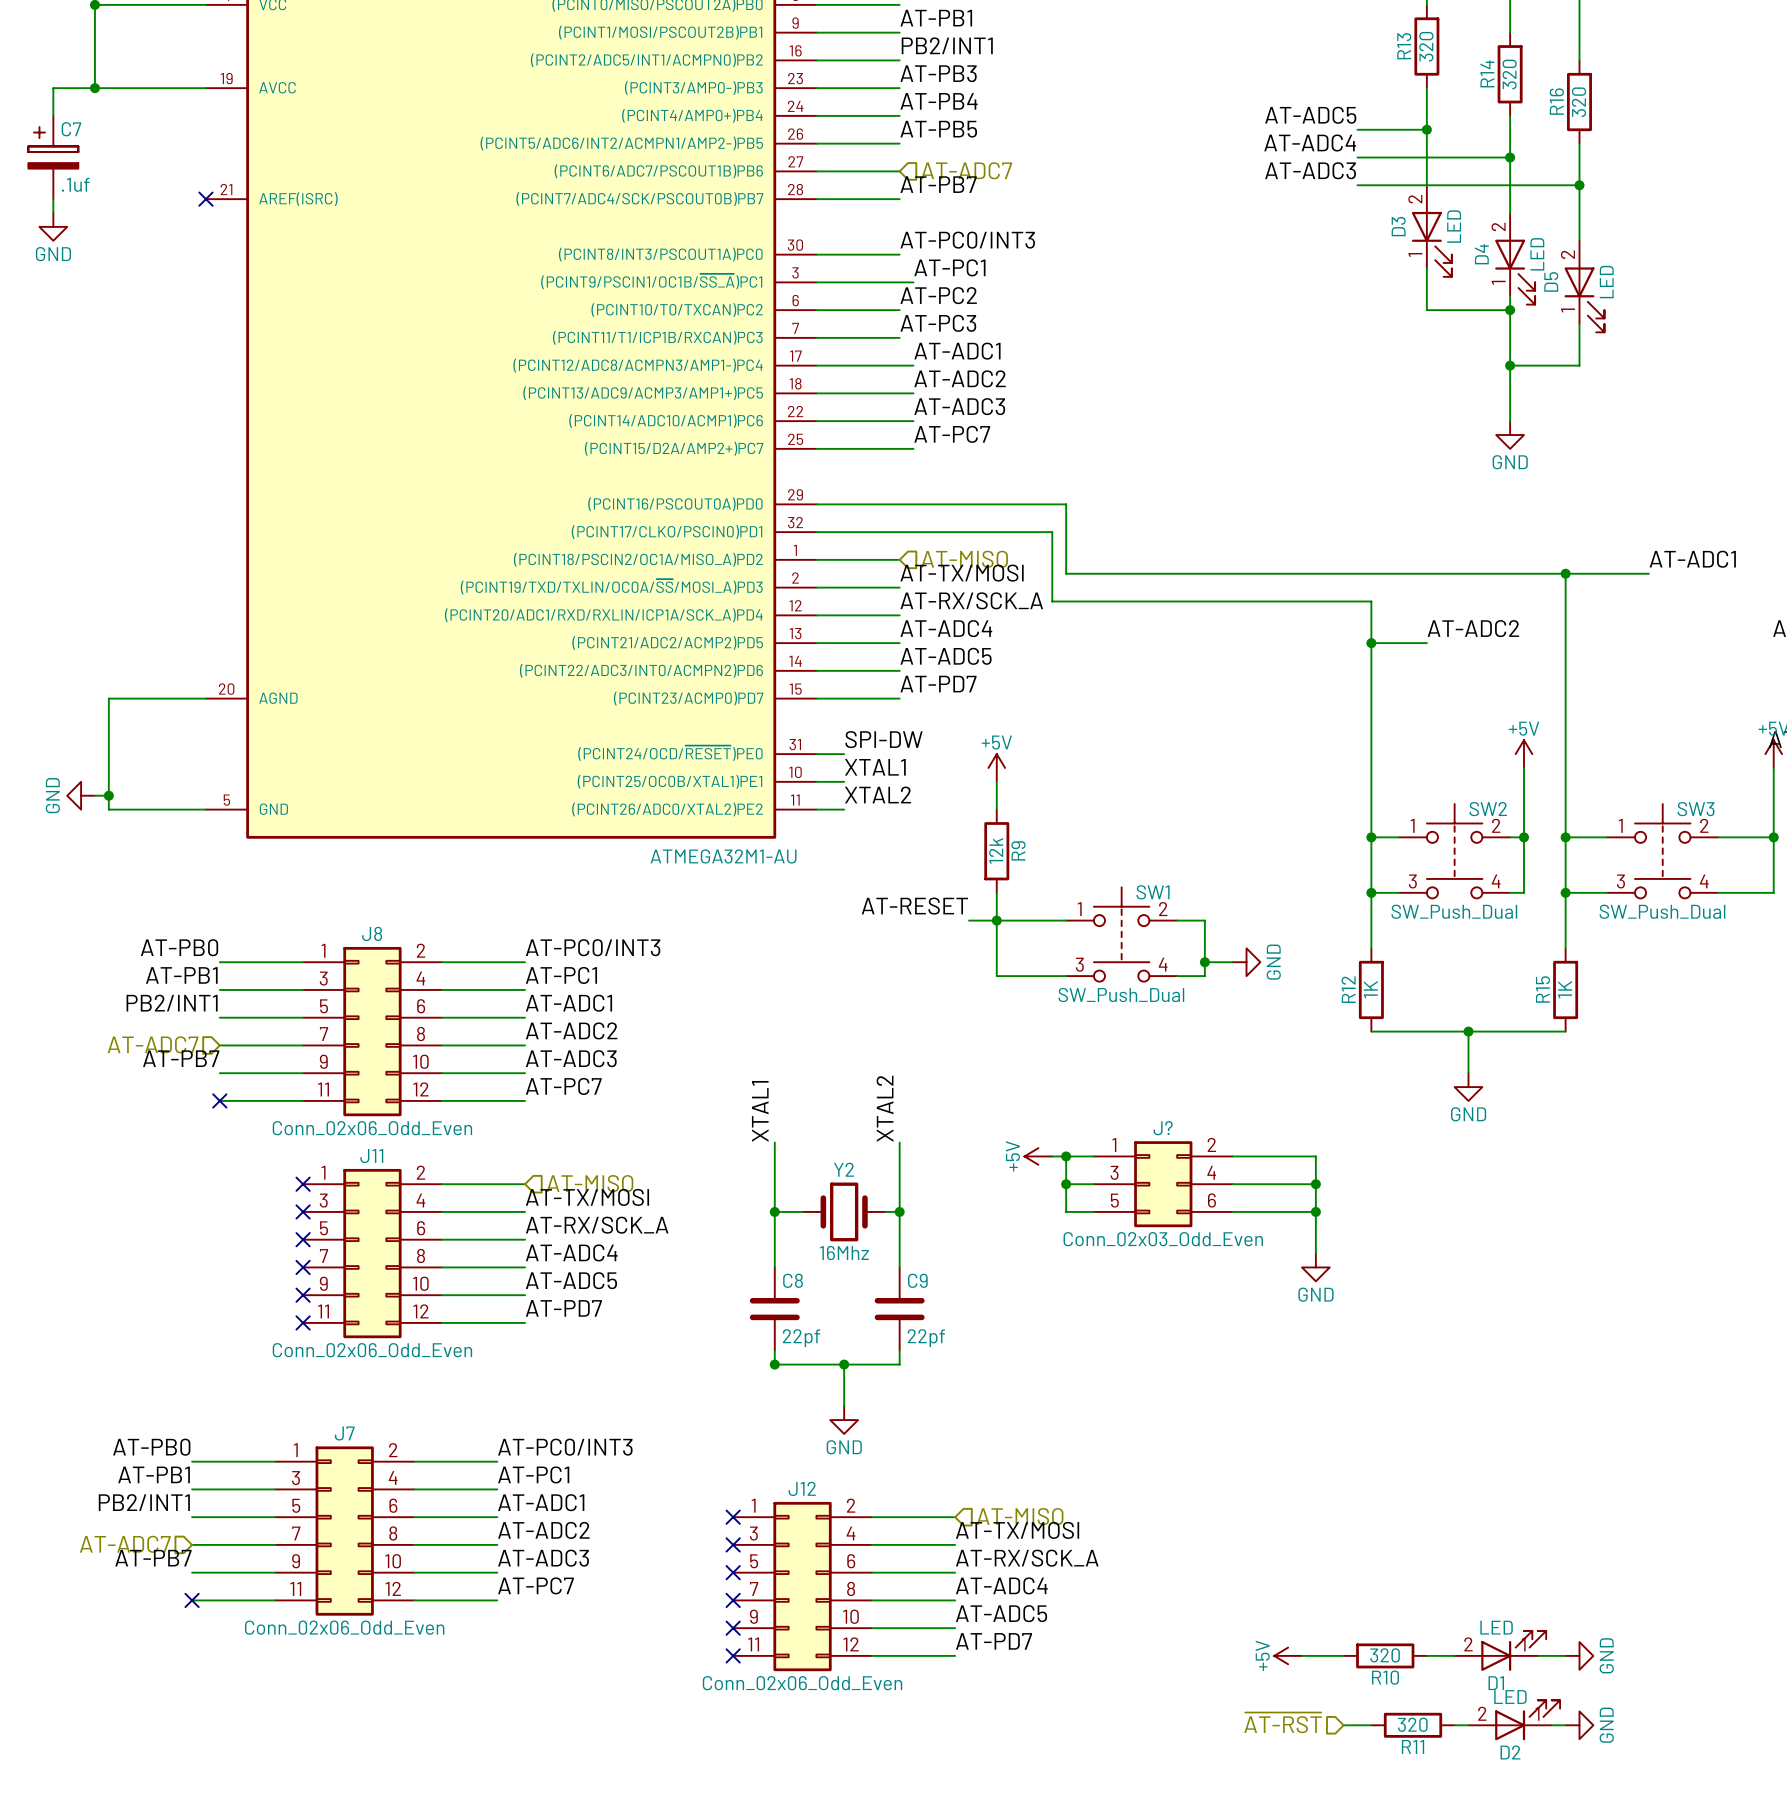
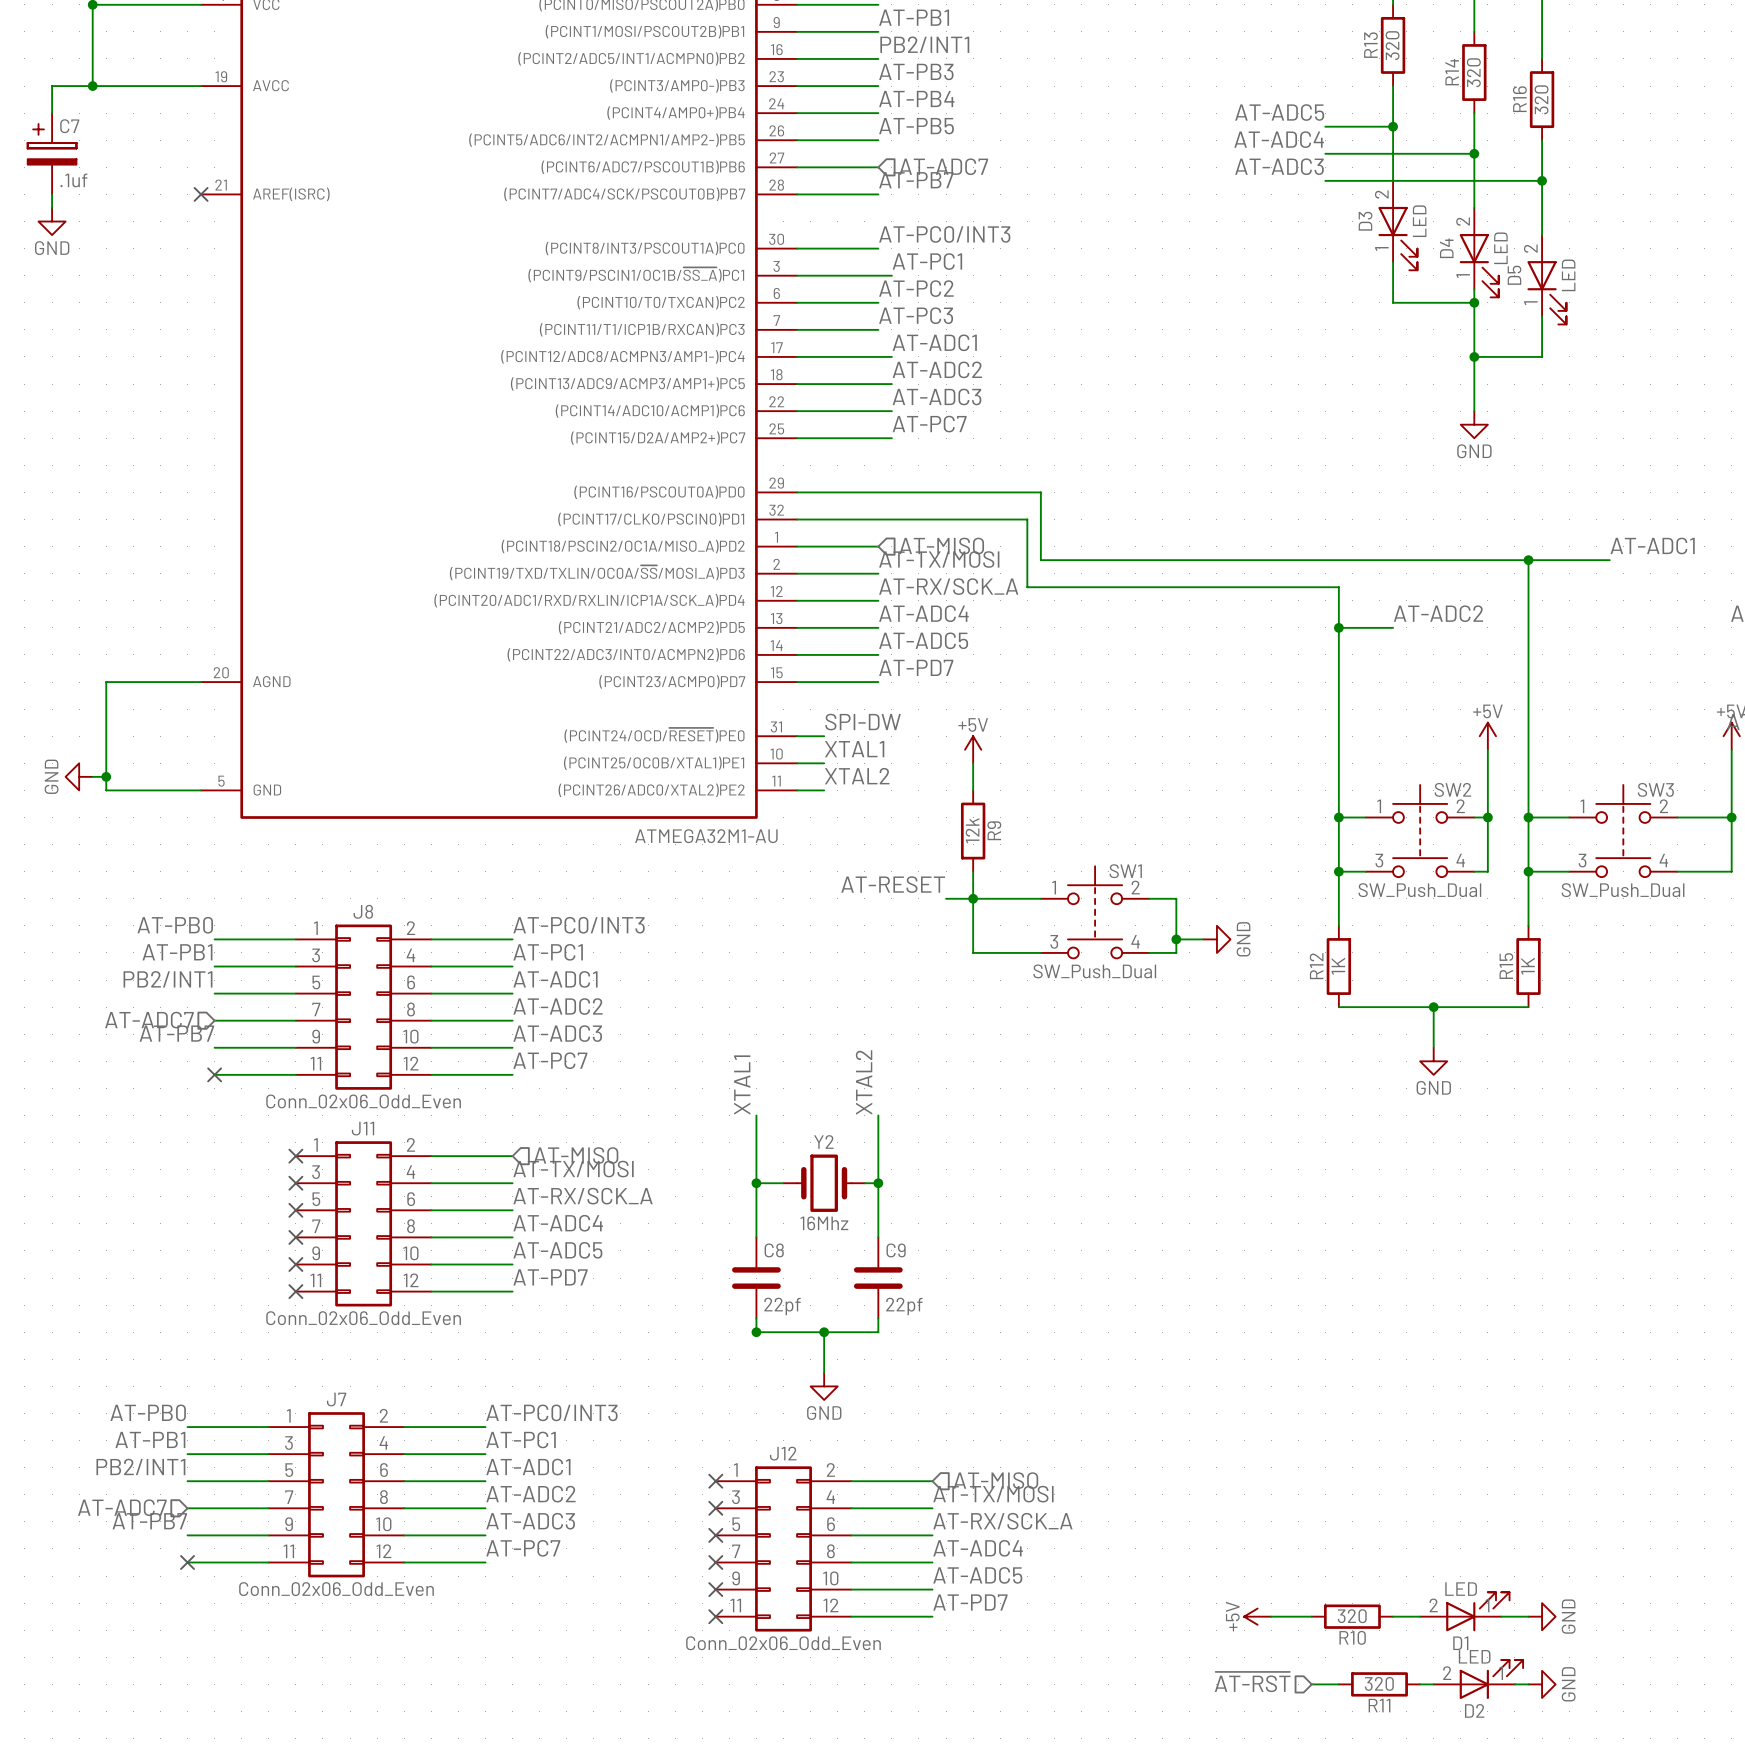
power symbol: +5V (1038, 1156) -> none
wire: (1052, 1156) (1093, 1156) -> none
wire: (1066, 1156) (1066, 1211) (1093, 1211) -> none
junction: (1066, 1156) -> none
wire: (1232, 1156) (1315, 1156) (1315, 1253) -> none
wire: (1066, 1184) (1093, 1184) -> none
junction: (1066, 1184) -> none
J?: Conn_02x03_Odd_Even (1163, 1184) -> none
wire: (1232, 1184) (1315, 1184) -> none
junction: (1315, 1184) -> none
wire: (1232, 1211) (1315, 1211) -> none
junction: (1315, 1211) -> none
power symbol: GND (1315, 1267) -> none

